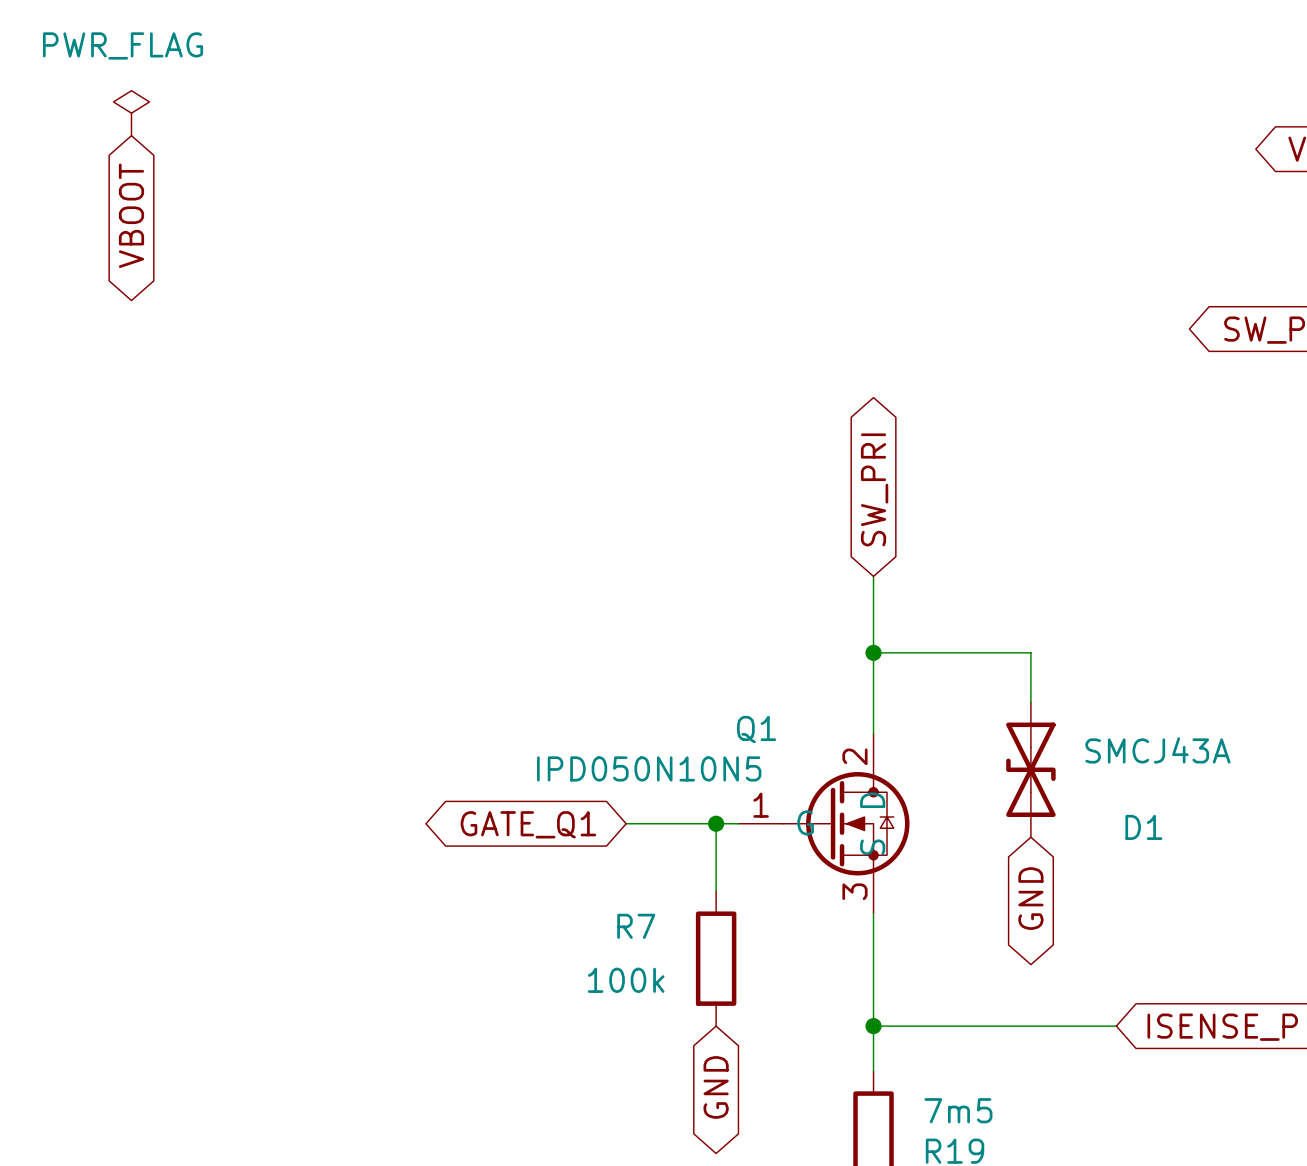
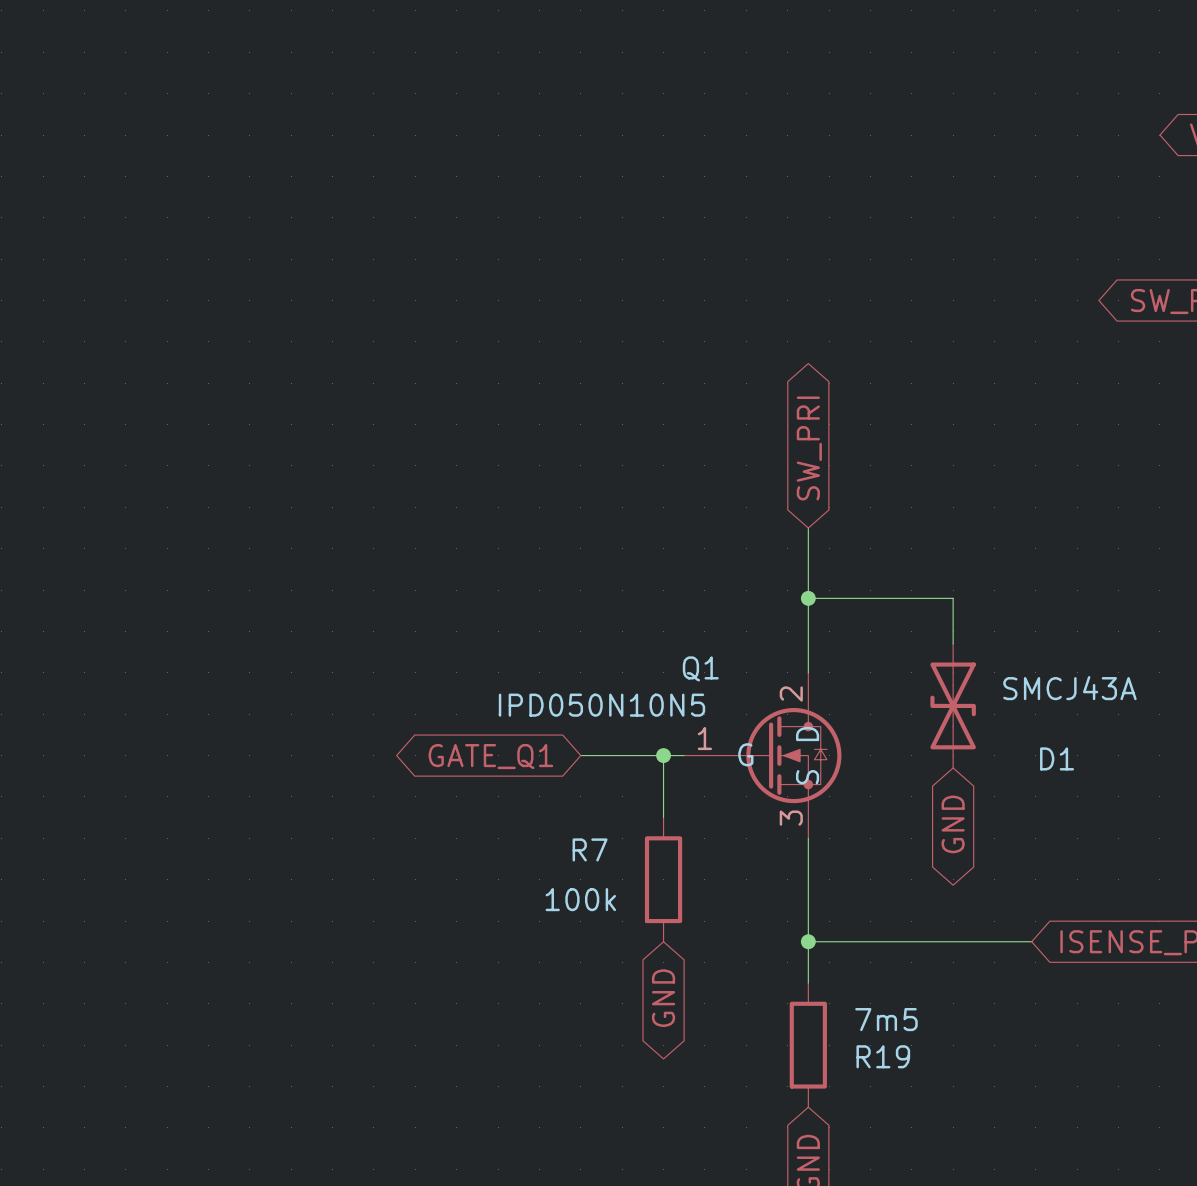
power symbol: PWR_FLAG (131, 113) -> none
global label: VBOOT (131, 215) -> none

